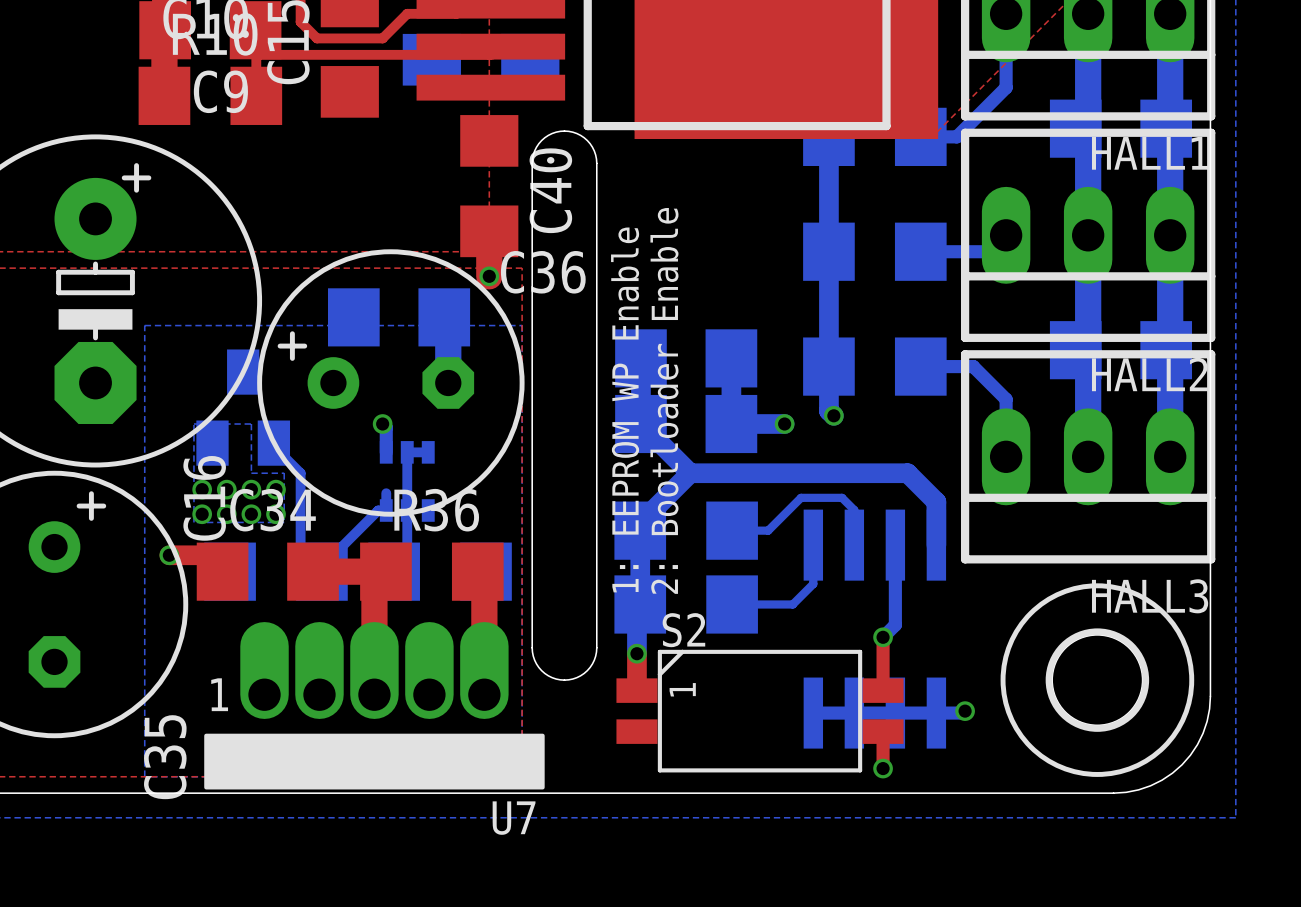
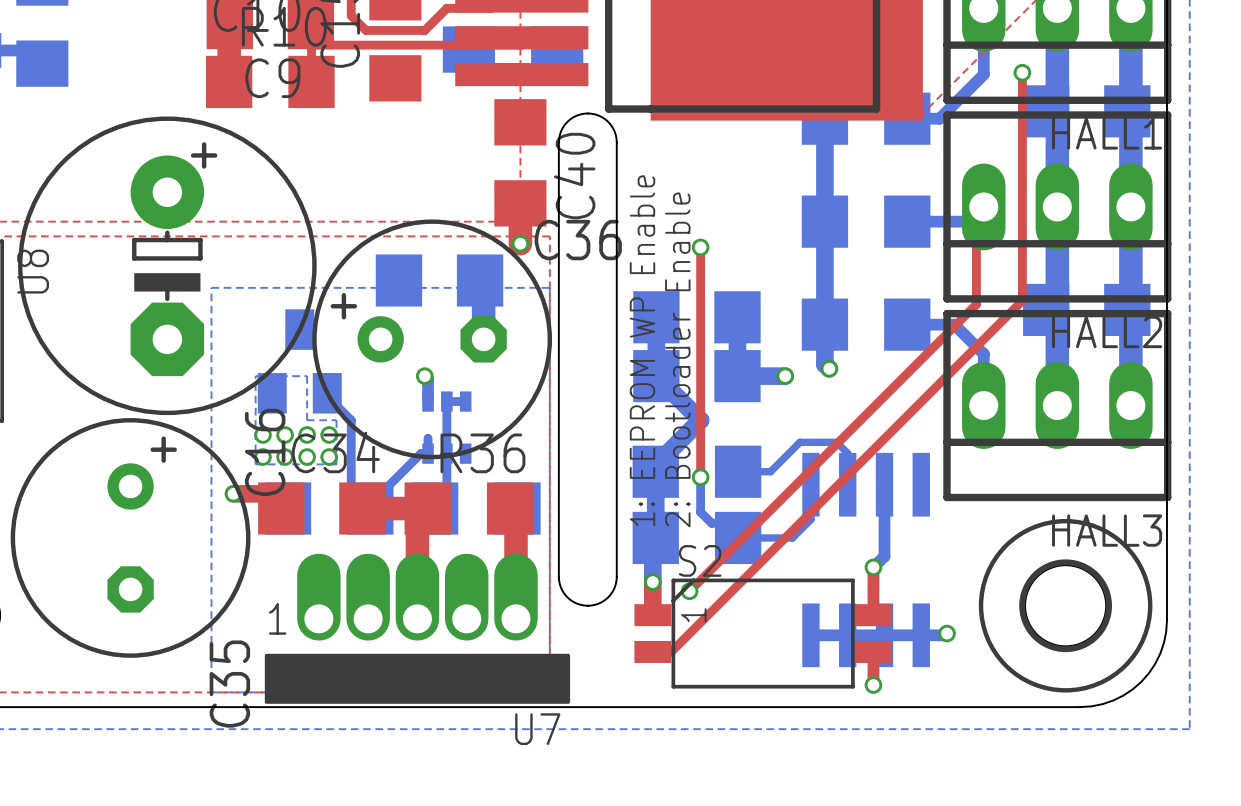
top track: none -> (1022, 72) (1022, 300) (671, 651) (652, 651)
via: none -> (1022, 72)
top track: none -> (983, 206) (980, 206) (976, 210) (976, 304) (689, 591)
top track: none -> (700, 247) (700, 477)
via: none -> (700, 247)
bottom track: (690, 473) (907, 473) (936, 501) (936, 545) -> none
bottom track: none -> (700, 477) (700, 512) (711, 523) (719, 523) (733, 537) (738, 537)
via: none -> (700, 477)
via: none -> (689, 591)

